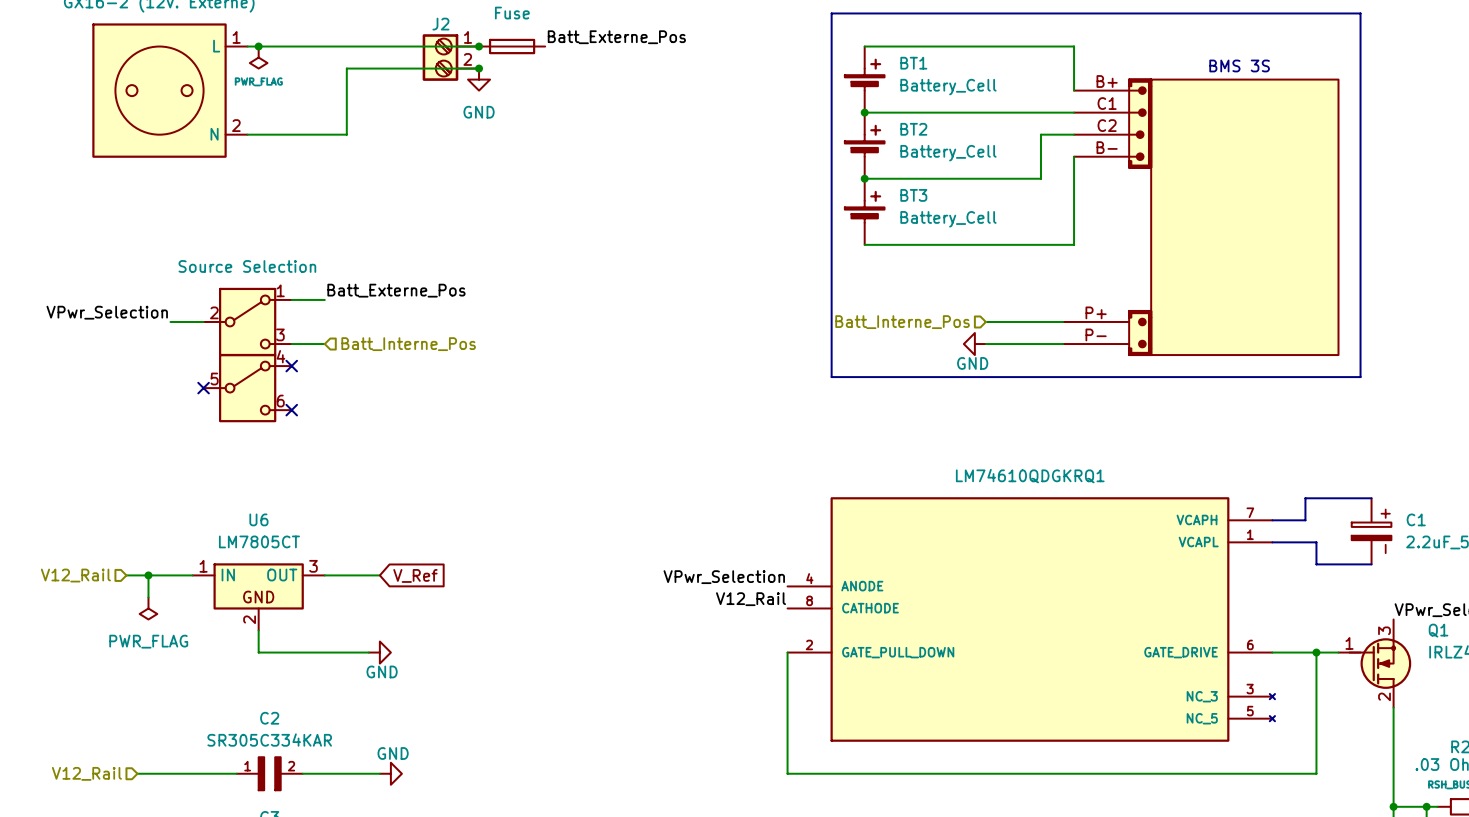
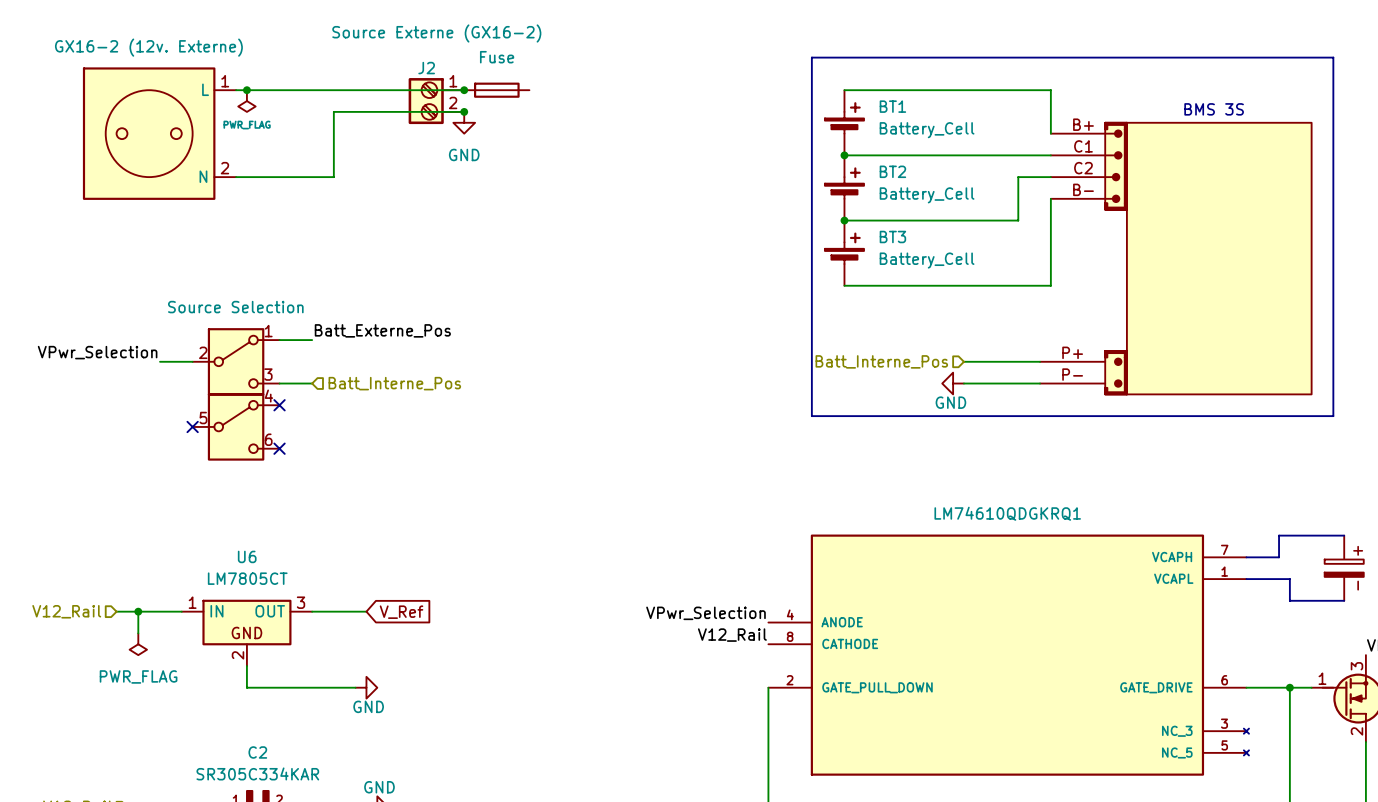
label: Batt_Externe_Pos (616, 37) -> none

